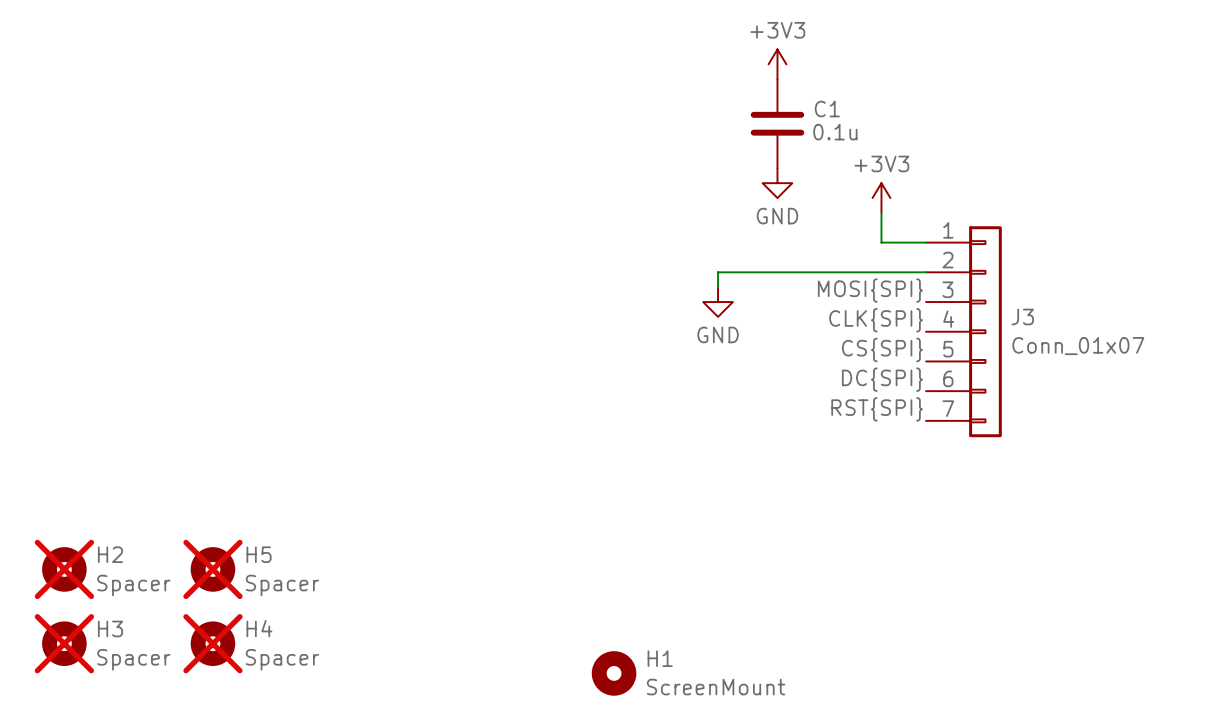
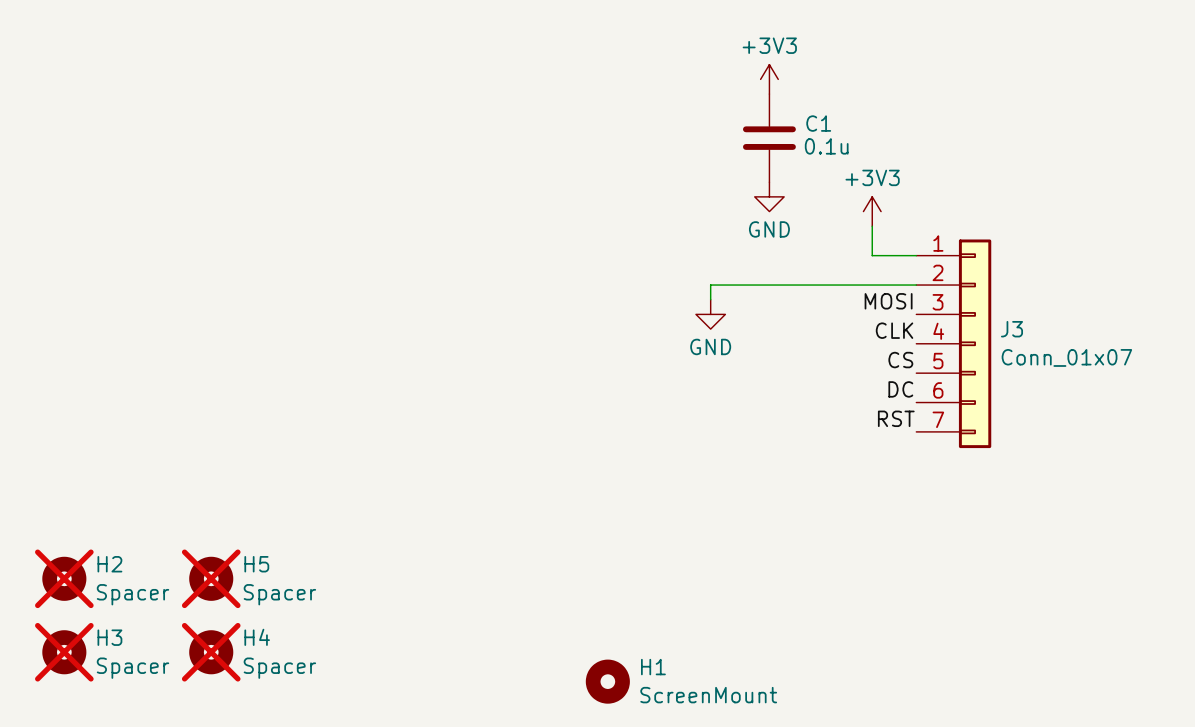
label: MOSI{SPI} (870, 290) -> MOSI (888, 301)
label: CLK{SPI} (876, 320) -> CLK (894, 330)
label: CS{SPI} (882, 349) -> CS (900, 360)
label: DC{SPI} (882, 379) -> DC (900, 389)
label: RST{SPI} (877, 409) -> RST (896, 418)

